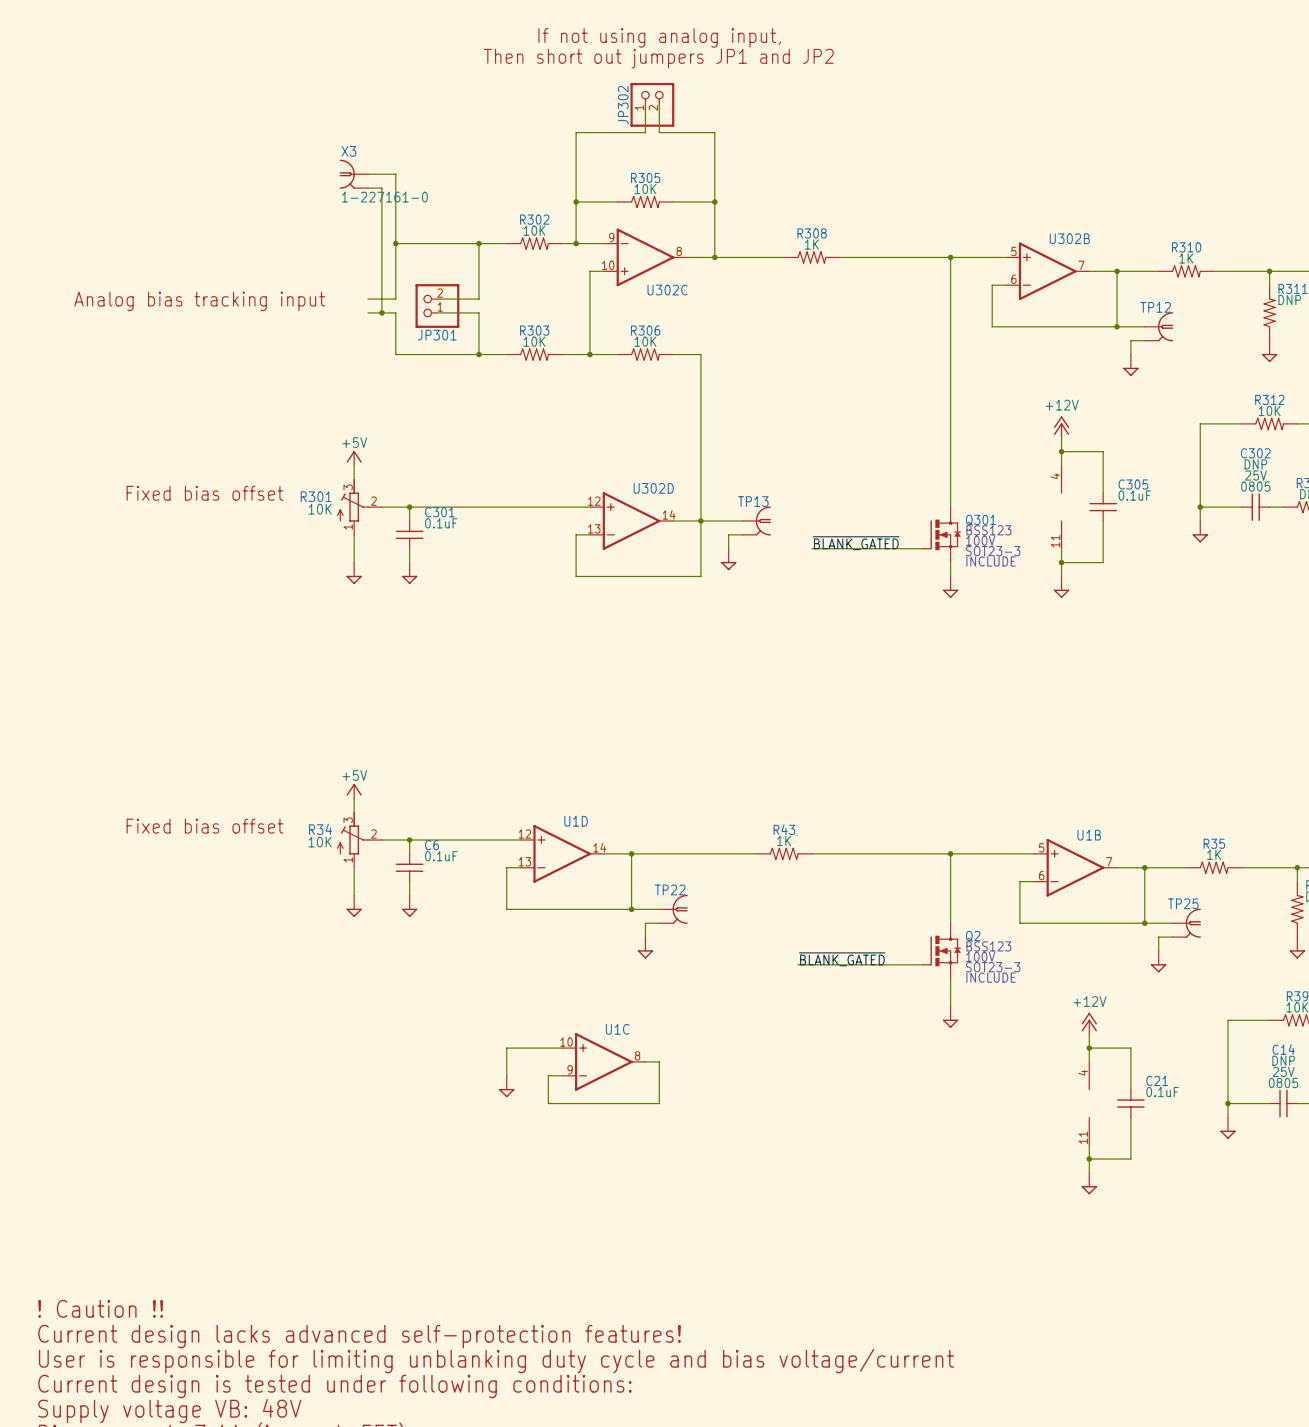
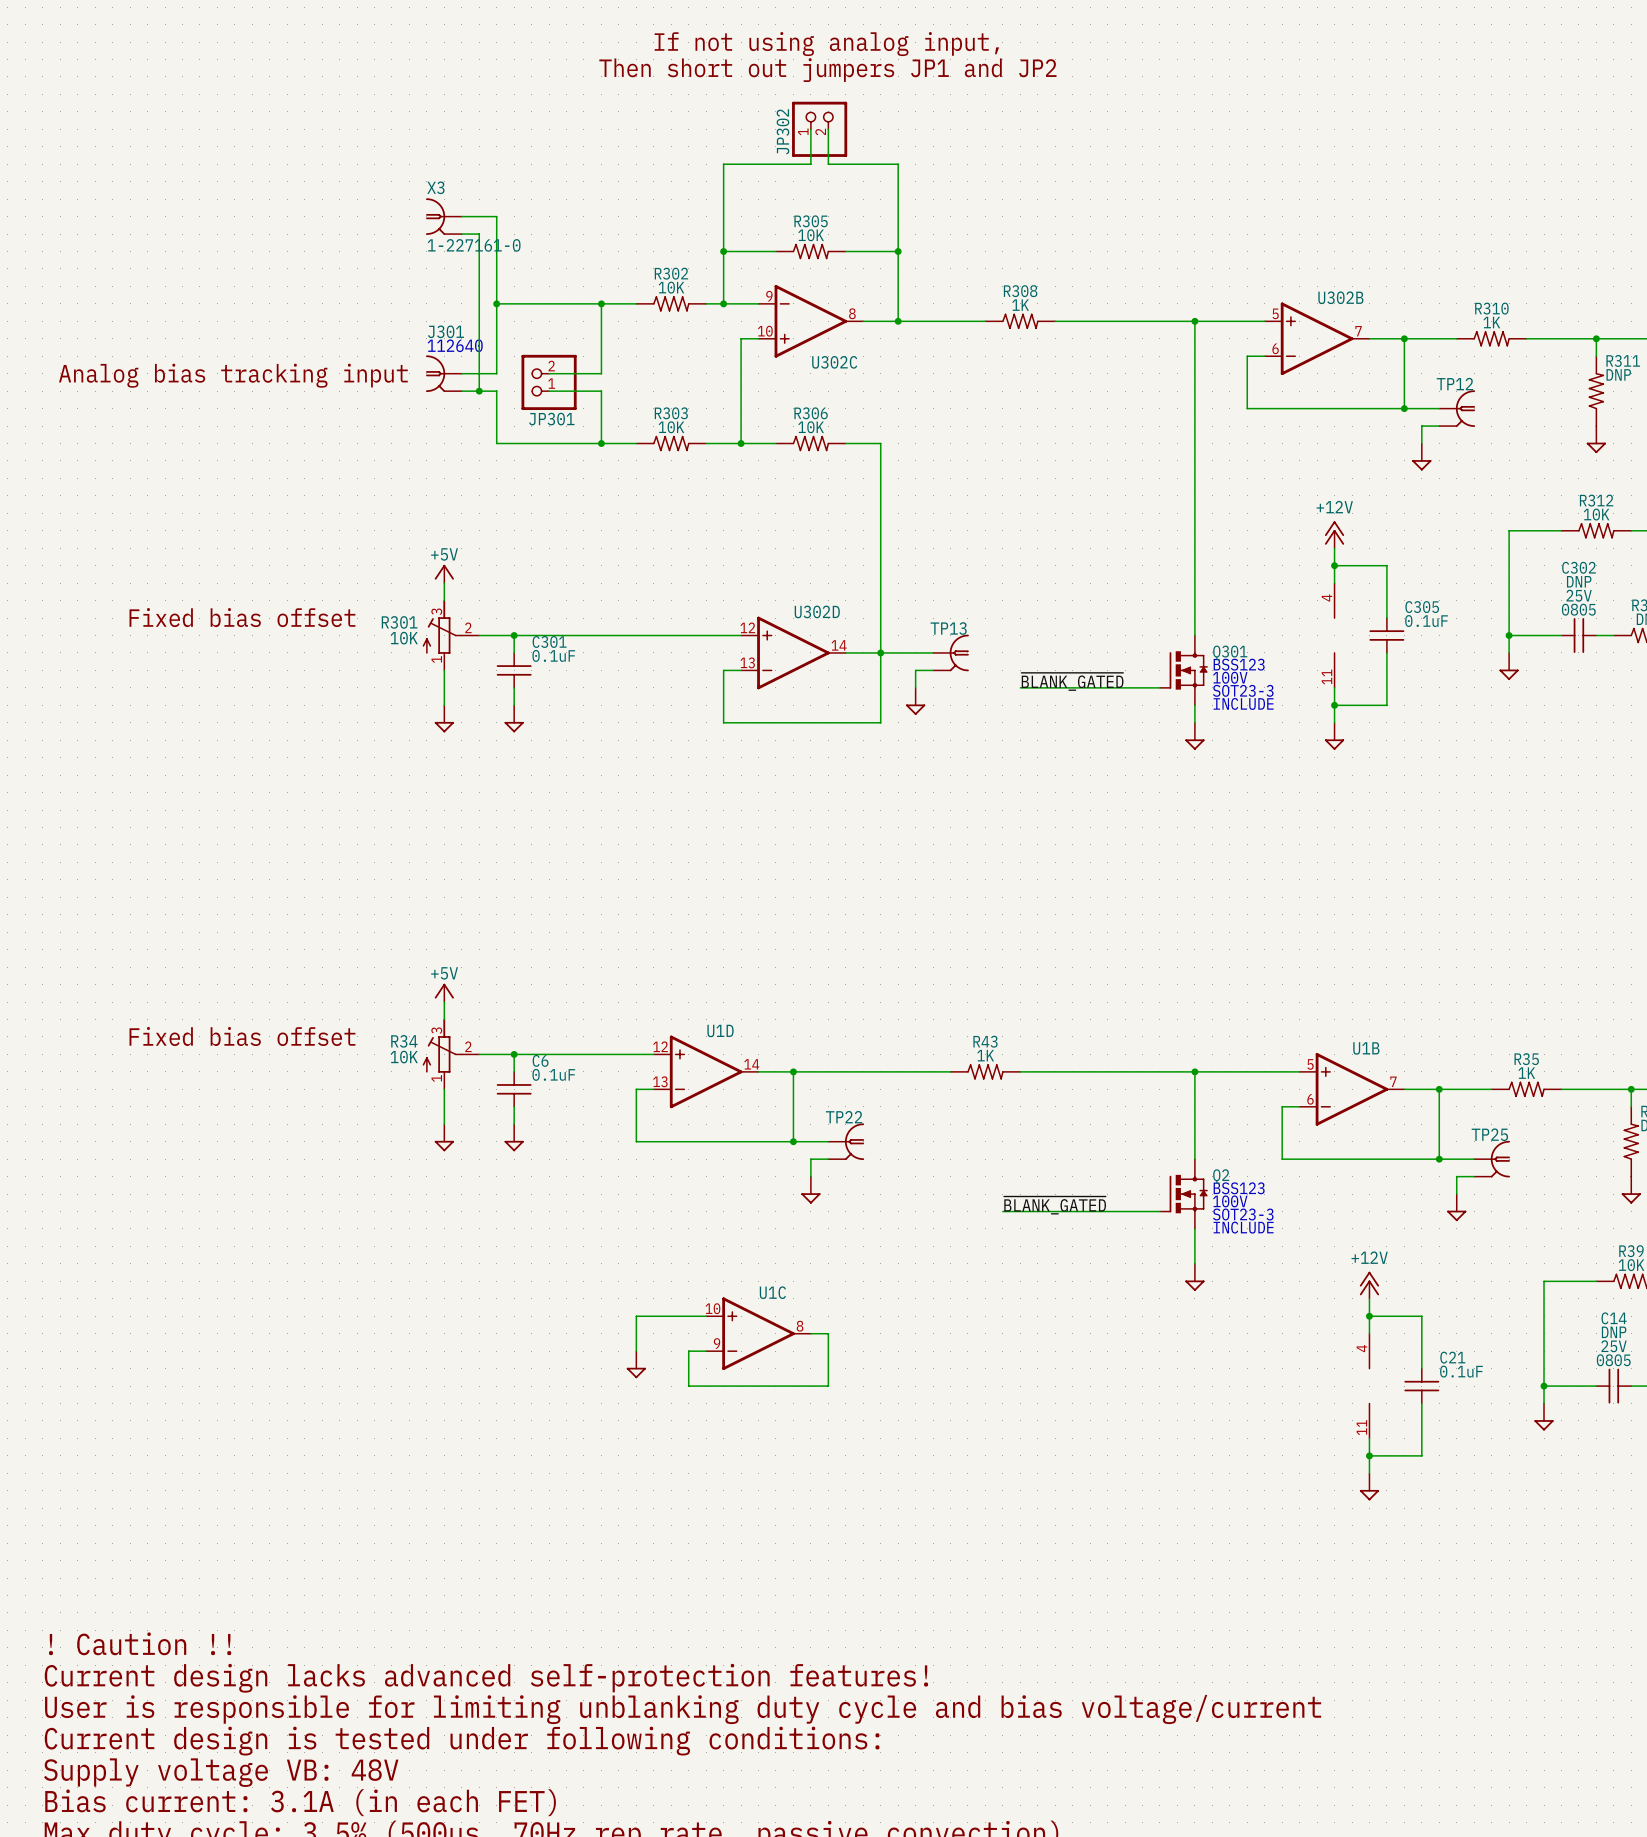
J301: none -> (443, 373)

